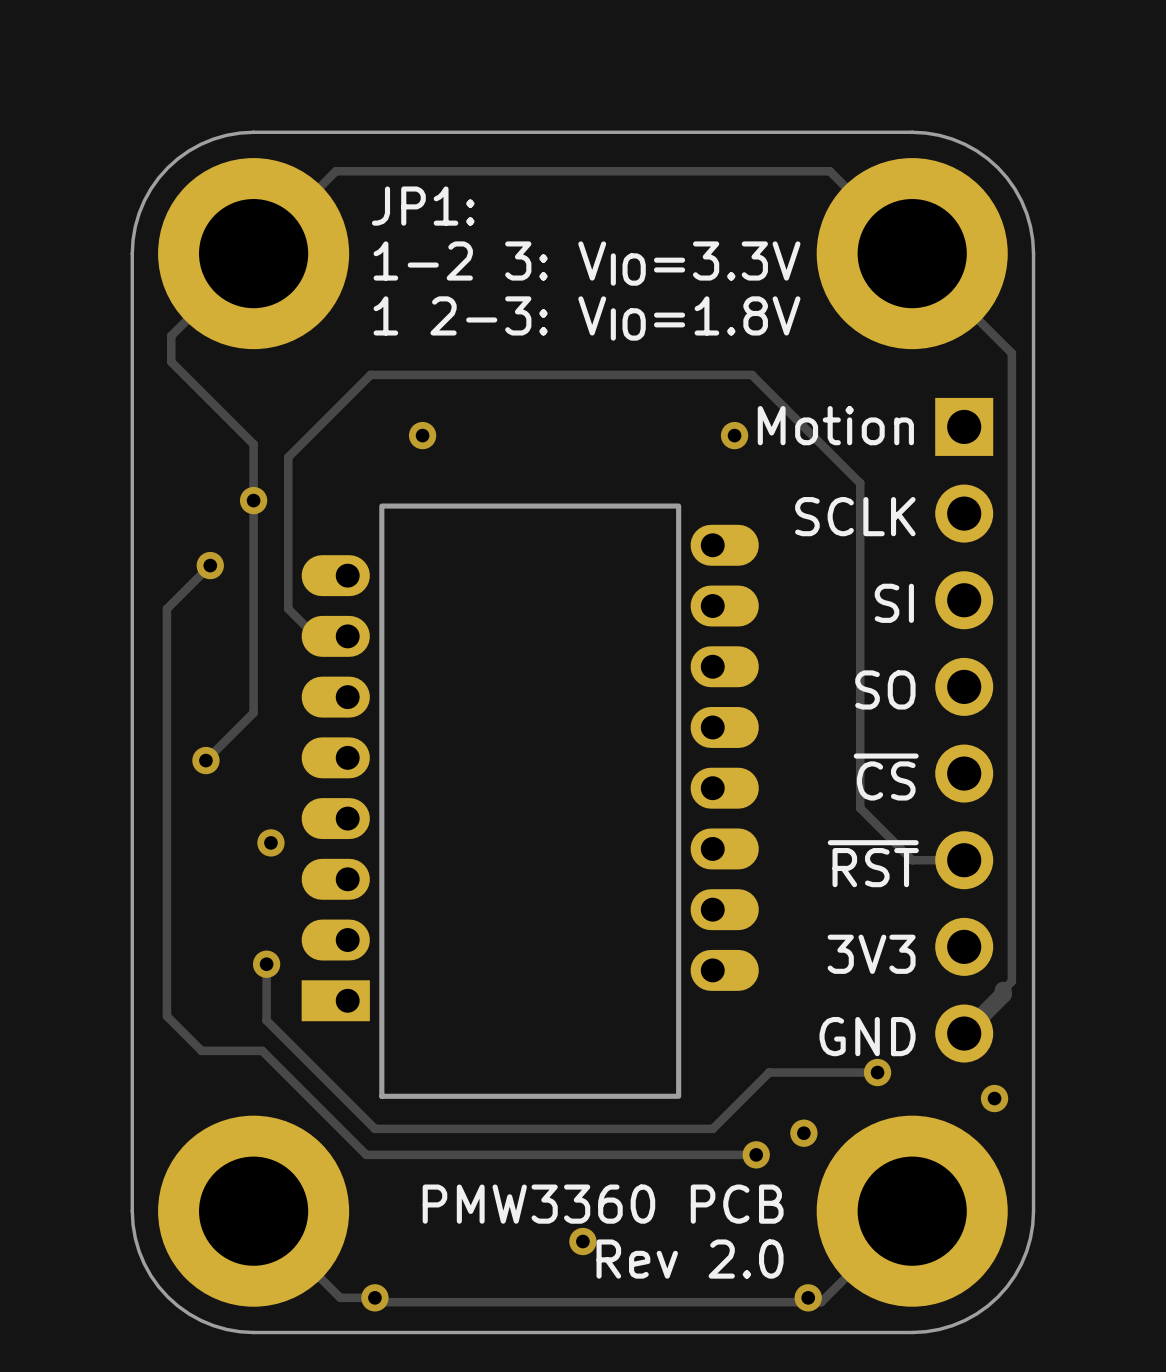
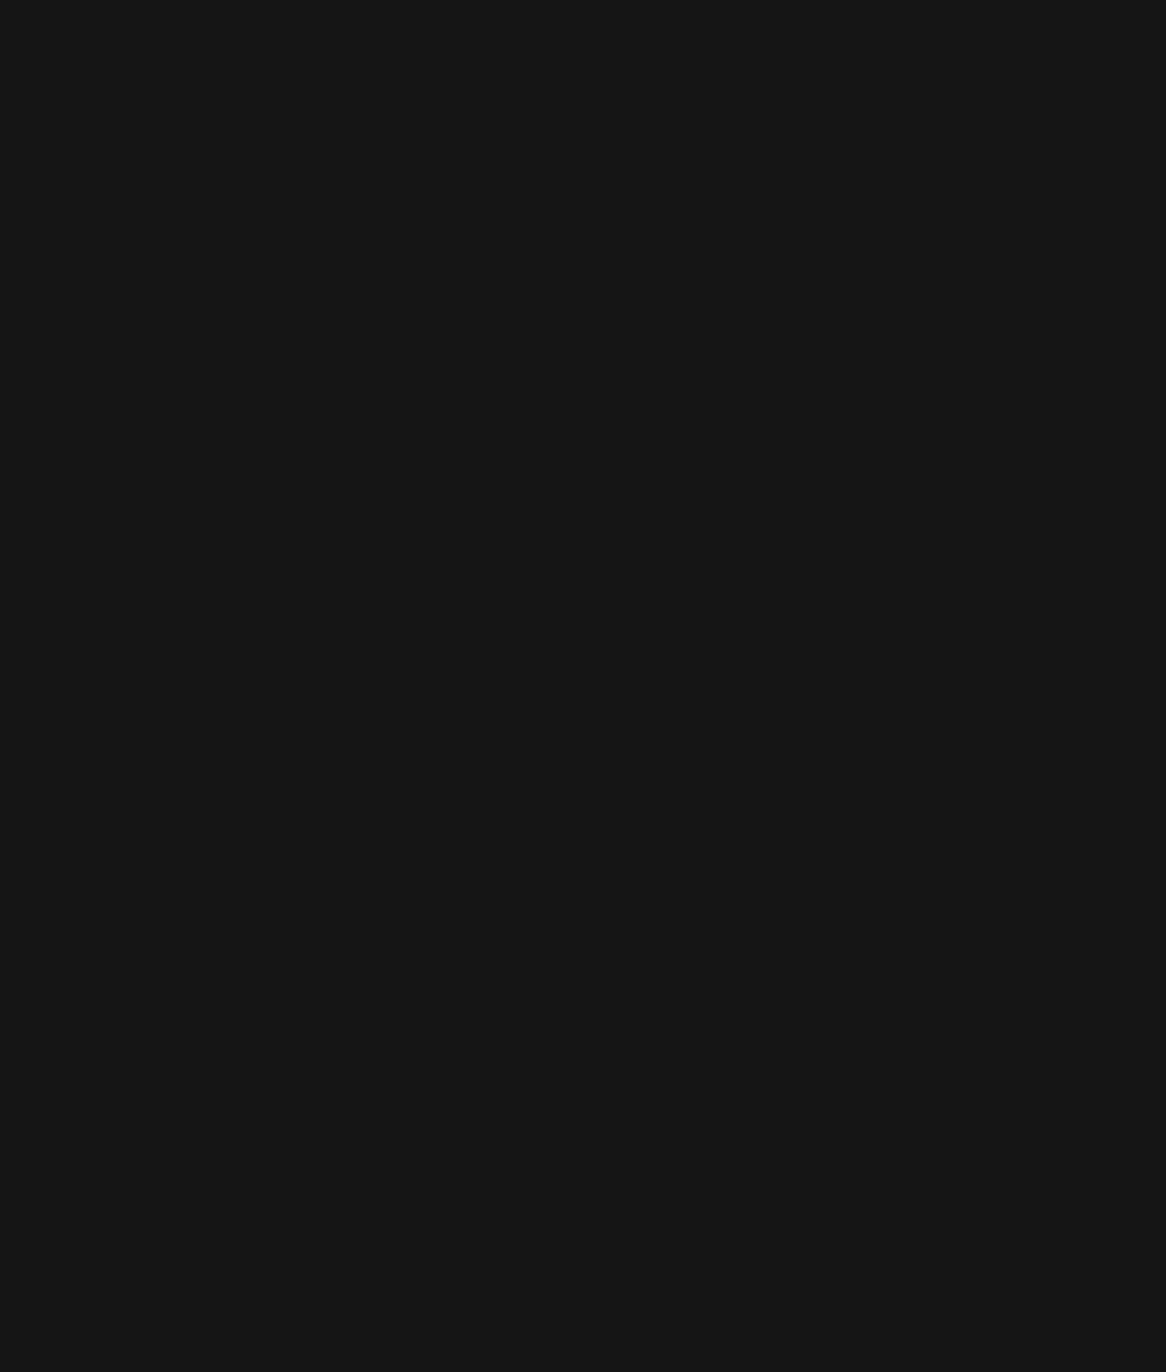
board edge: (912, 132) (240, 133) (213, 139) (189, 150) (167, 167) (150, 189) (144, 200) (135, 226) (132, 253) (132, 1211) (133, 1224) (139, 1251) (150, 1275) (167, 1296) (189, 1313) (200, 1320) (226, 1329) (253, 1332) (912, 1332) (939, 1329) (964, 1320) (987, 1306) (1007, 1286) (1014, 1275) (1026, 1251) (1030, 1238) (1033, 1211) (1032, 240) (1030, 226) (1021, 200) (1007, 177) (987, 158) (964, 144) (952, 139) (925, 133) (912, 132) -> none
text: JP1: (423, 206) -> none
part: (253, 253) -> none
part: (912, 253) -> none
text: 1-2 3: VIO=3.3V (587, 263) -> none
text: 1 2-3: VIO=1.8V (587, 318) -> none
text: Motion (835, 425) -> none
via: (422, 435) -> none
via: (734, 435) -> none
via: (253, 500) -> none
text: SCLK (855, 516) -> none
track: (210, 565) (166, 608) (166, 1016) (201, 1050) (262, 1050) (366, 1154) (756, 1154) -> none
via: (210, 565) -> none
text: SI (894, 603) -> none
track: (347, 636) (315, 636) (288, 608) (288, 457) (370, 374) (751, 374) (860, 483) (860, 808) (912, 860) (964, 860) -> none
text: SO (885, 689) -> none
part: (964, 730) -> none
track: (205, 760) (253, 712) (253, 444) (171, 361) (171, 335) (335, 171) (829, 171) (1011, 353) (1011, 981) (1003, 990) (1003, 994) (964, 1033) -> none
via: (205, 760) -> none
text: ~{CS} (886, 777) -> none
part: (530, 801) -> none
via: (270, 842) -> none
text: ~{RST} (873, 863) -> none
text: 3V3 (871, 954) -> none
track: (266, 964) (266, 1020) (374, 1128) (712, 1128) (769, 1072) (877, 1072) -> none
via: (266, 964) -> none
text: GND (867, 1036) -> none
via: (877, 1072) -> none
via: (994, 1098) -> none
via: (803, 1133) -> none
via: (756, 1154) -> none
text: PMW3360 PCB (603, 1204) -> none
part: (253, 1211) -> none
track: (912, 1211) (821, 1302) (379, 1302) (374, 1297) (340, 1297) (262, 1219) (262, 1211) -> none
part: (912, 1211) -> none
via: (582, 1241) -> none
text: Rev 2.0 (690, 1259) -> none
via: (374, 1297) -> none
via: (808, 1297) -> none

